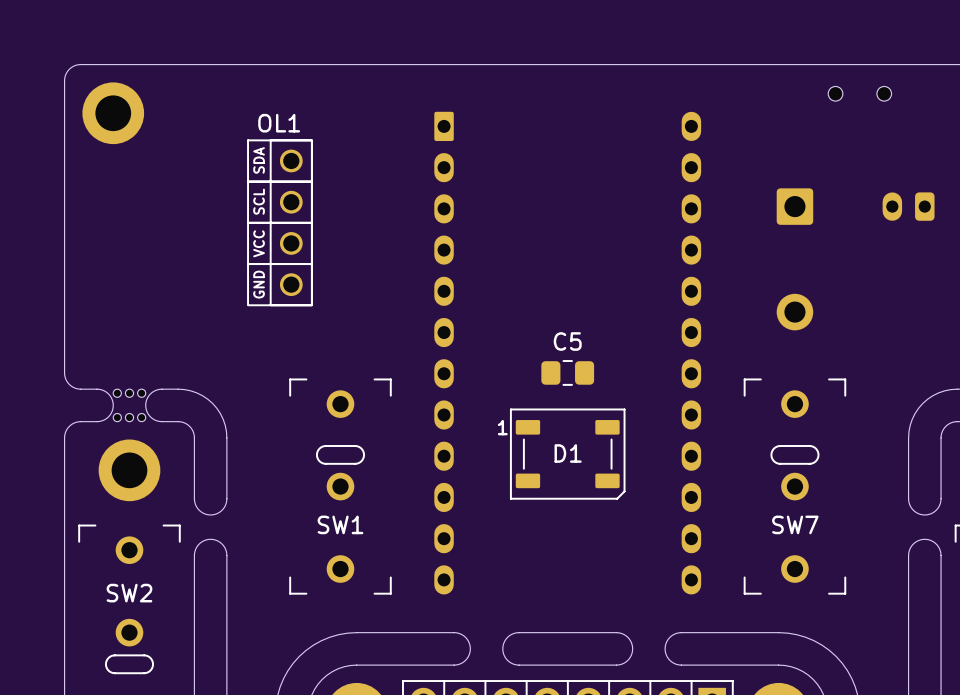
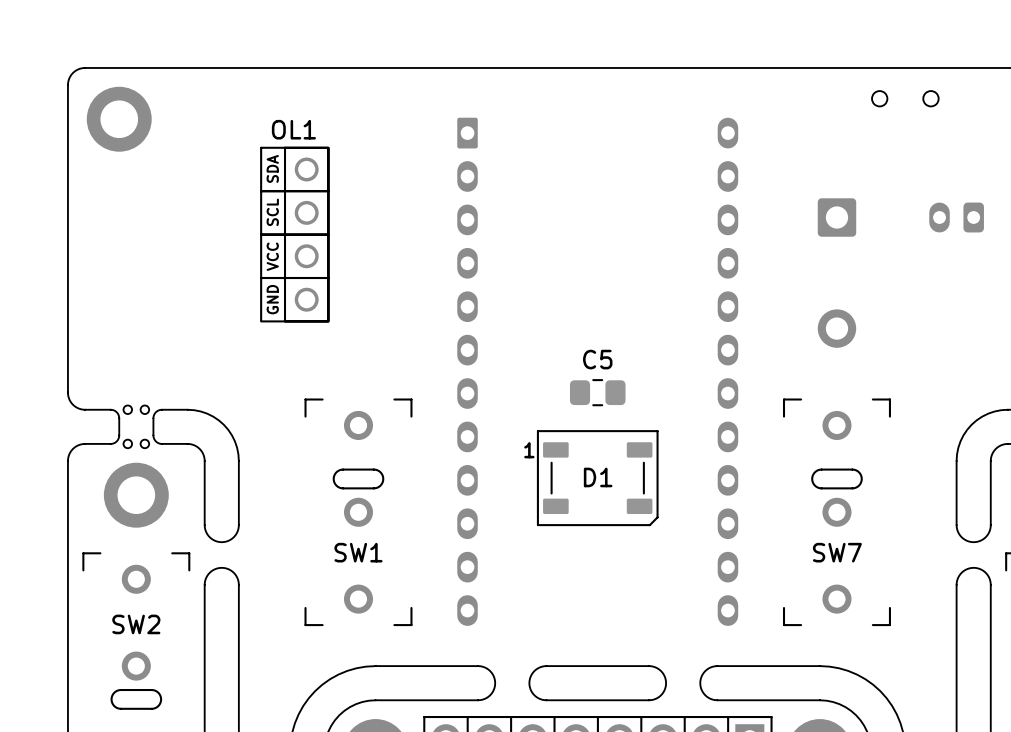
board edge: none -> (102, 409) (112, 410) (118, 414) (119, 435) (114, 442) (102, 443)
part: none -> (127, 409)
part: none -> (144, 409)
board edge: none -> (170, 409) (157, 410) (153, 418) (154, 439) (160, 443) (170, 443)
part: (129, 405) -> none
part: none -> (127, 443)
part: none -> (144, 443)

